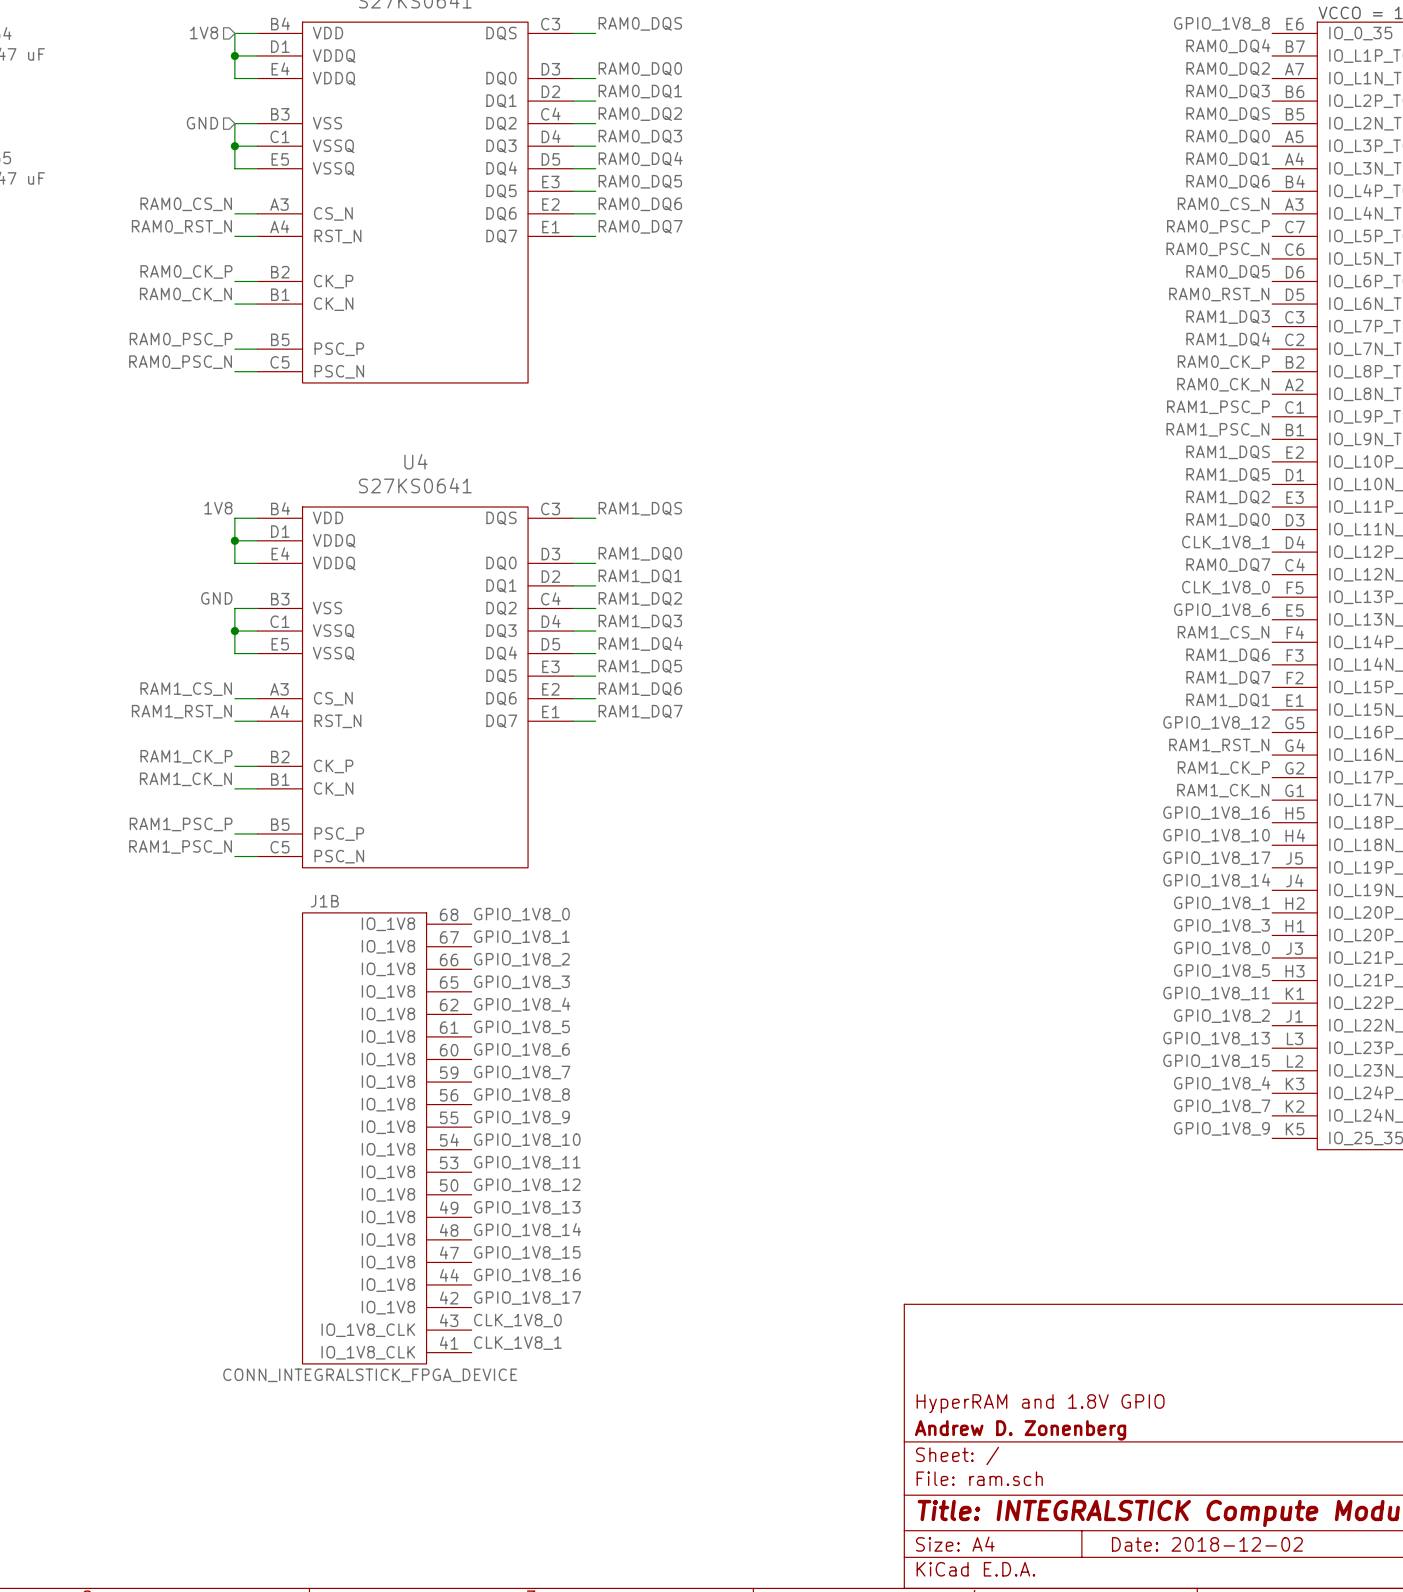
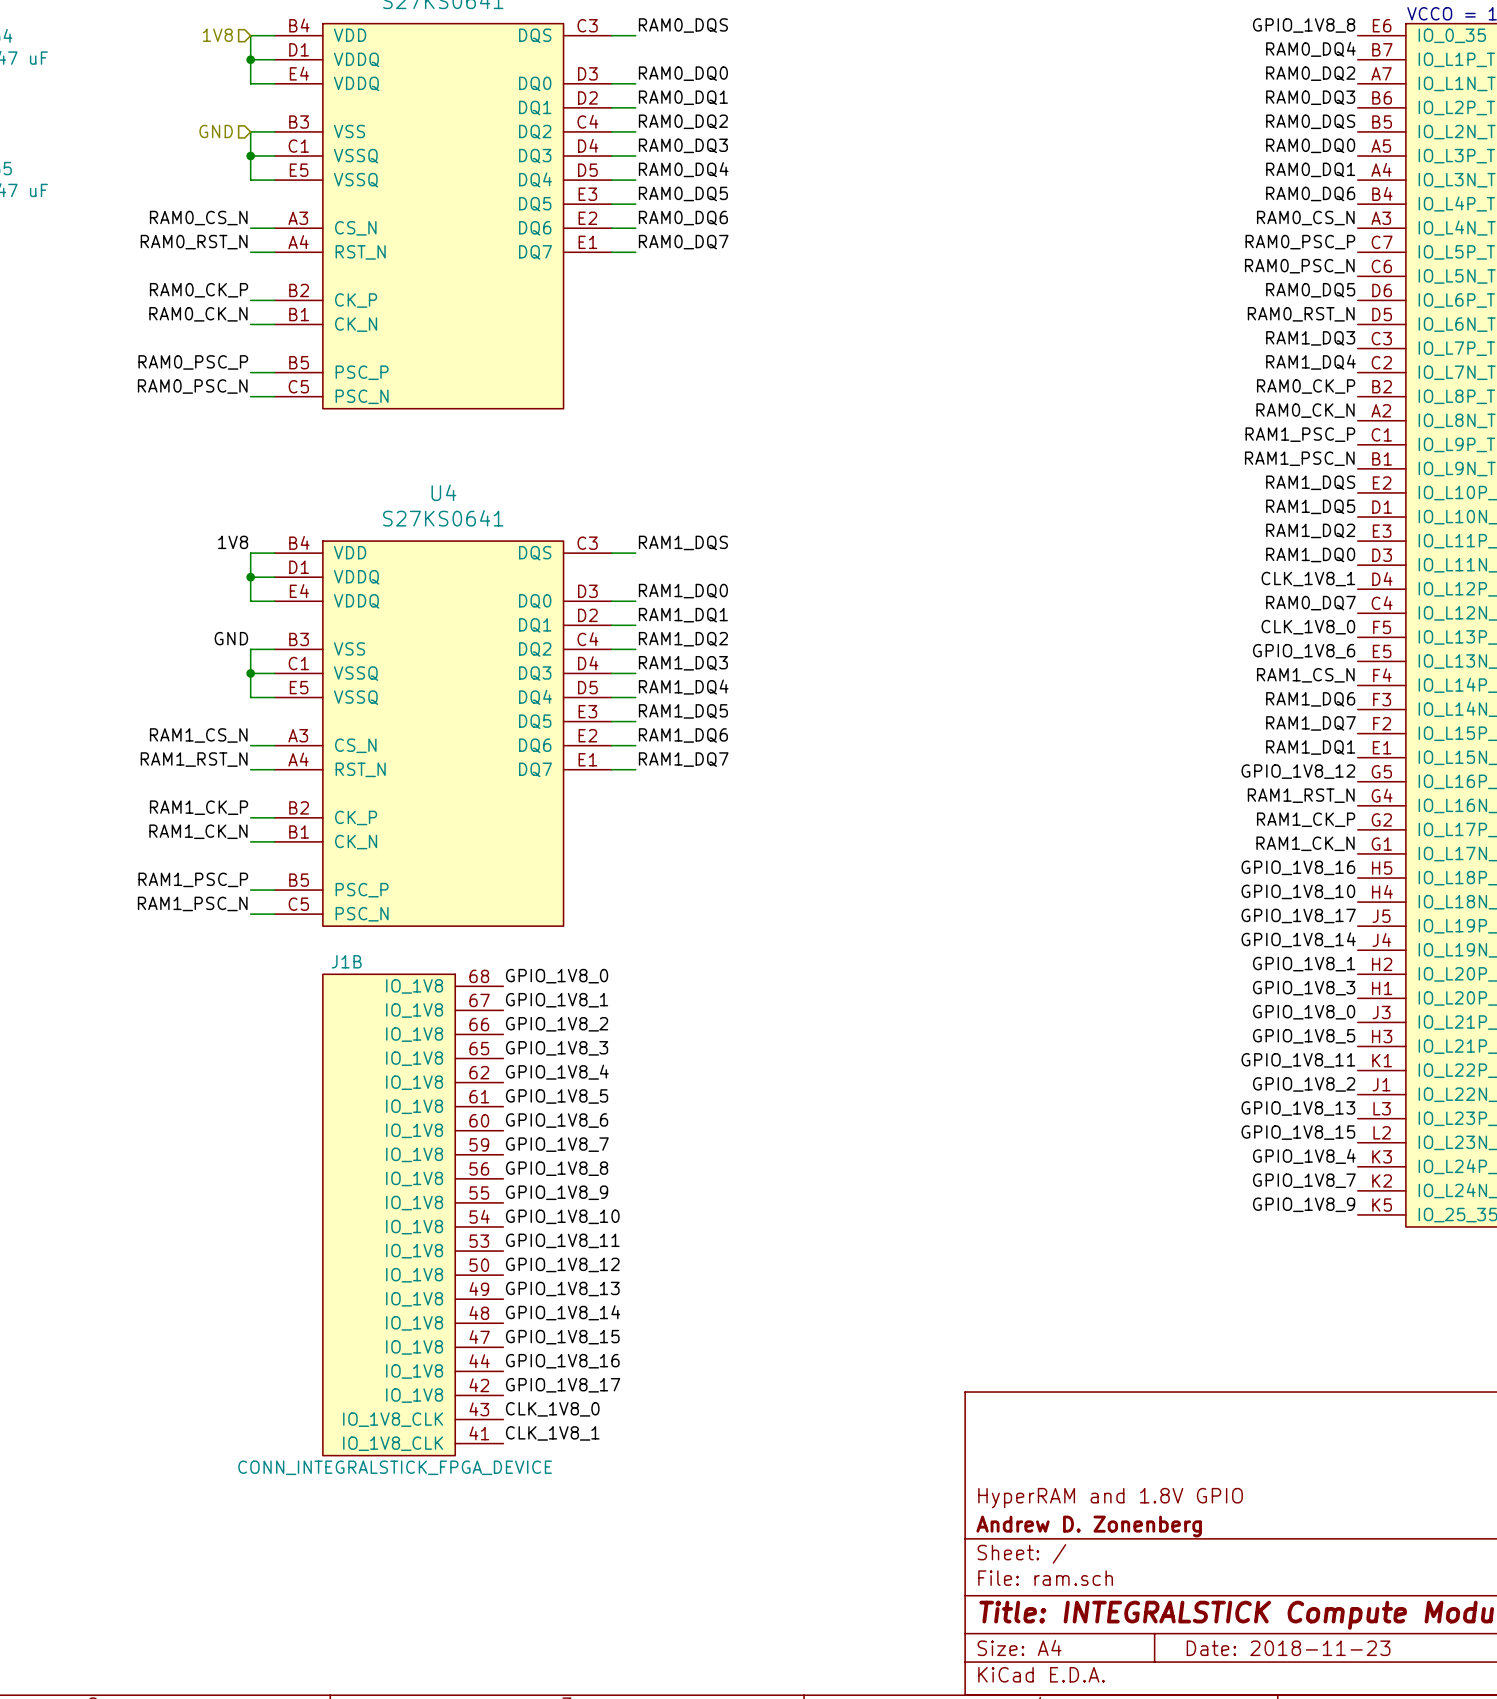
title block: Date: 2018-12-02 (1207, 1544) -> Date: 2018-11-23 (1288, 1648)

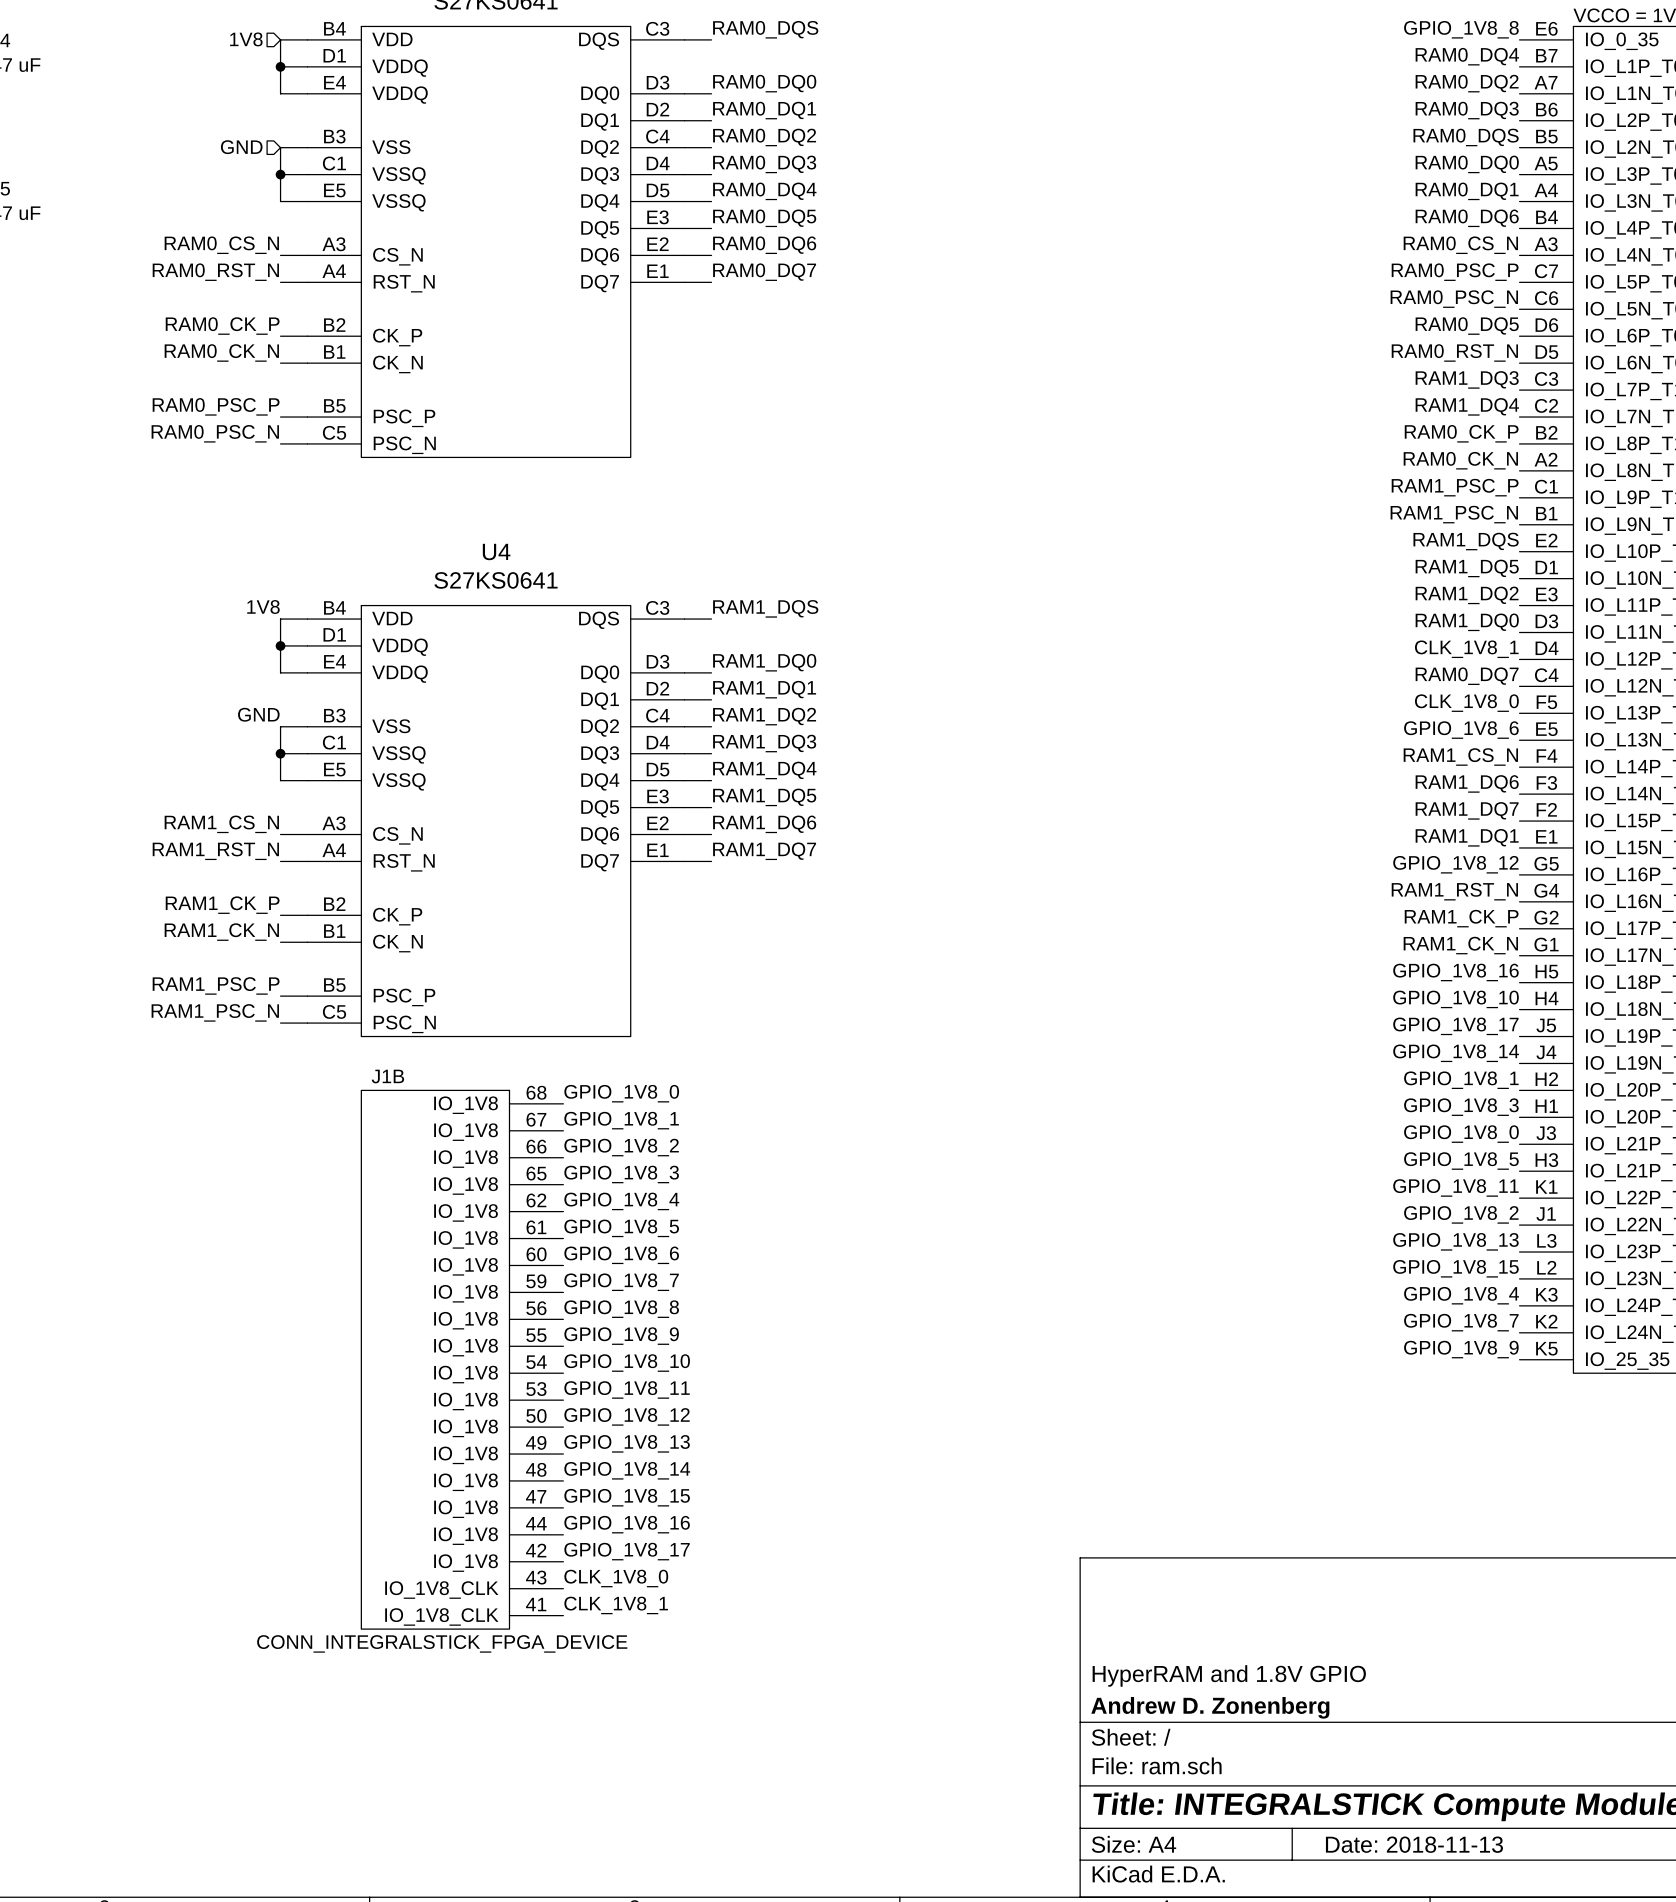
title block: Date: 2018-11-23 (1288, 1648) -> Date: 2018-11-13 (1414, 1844)

